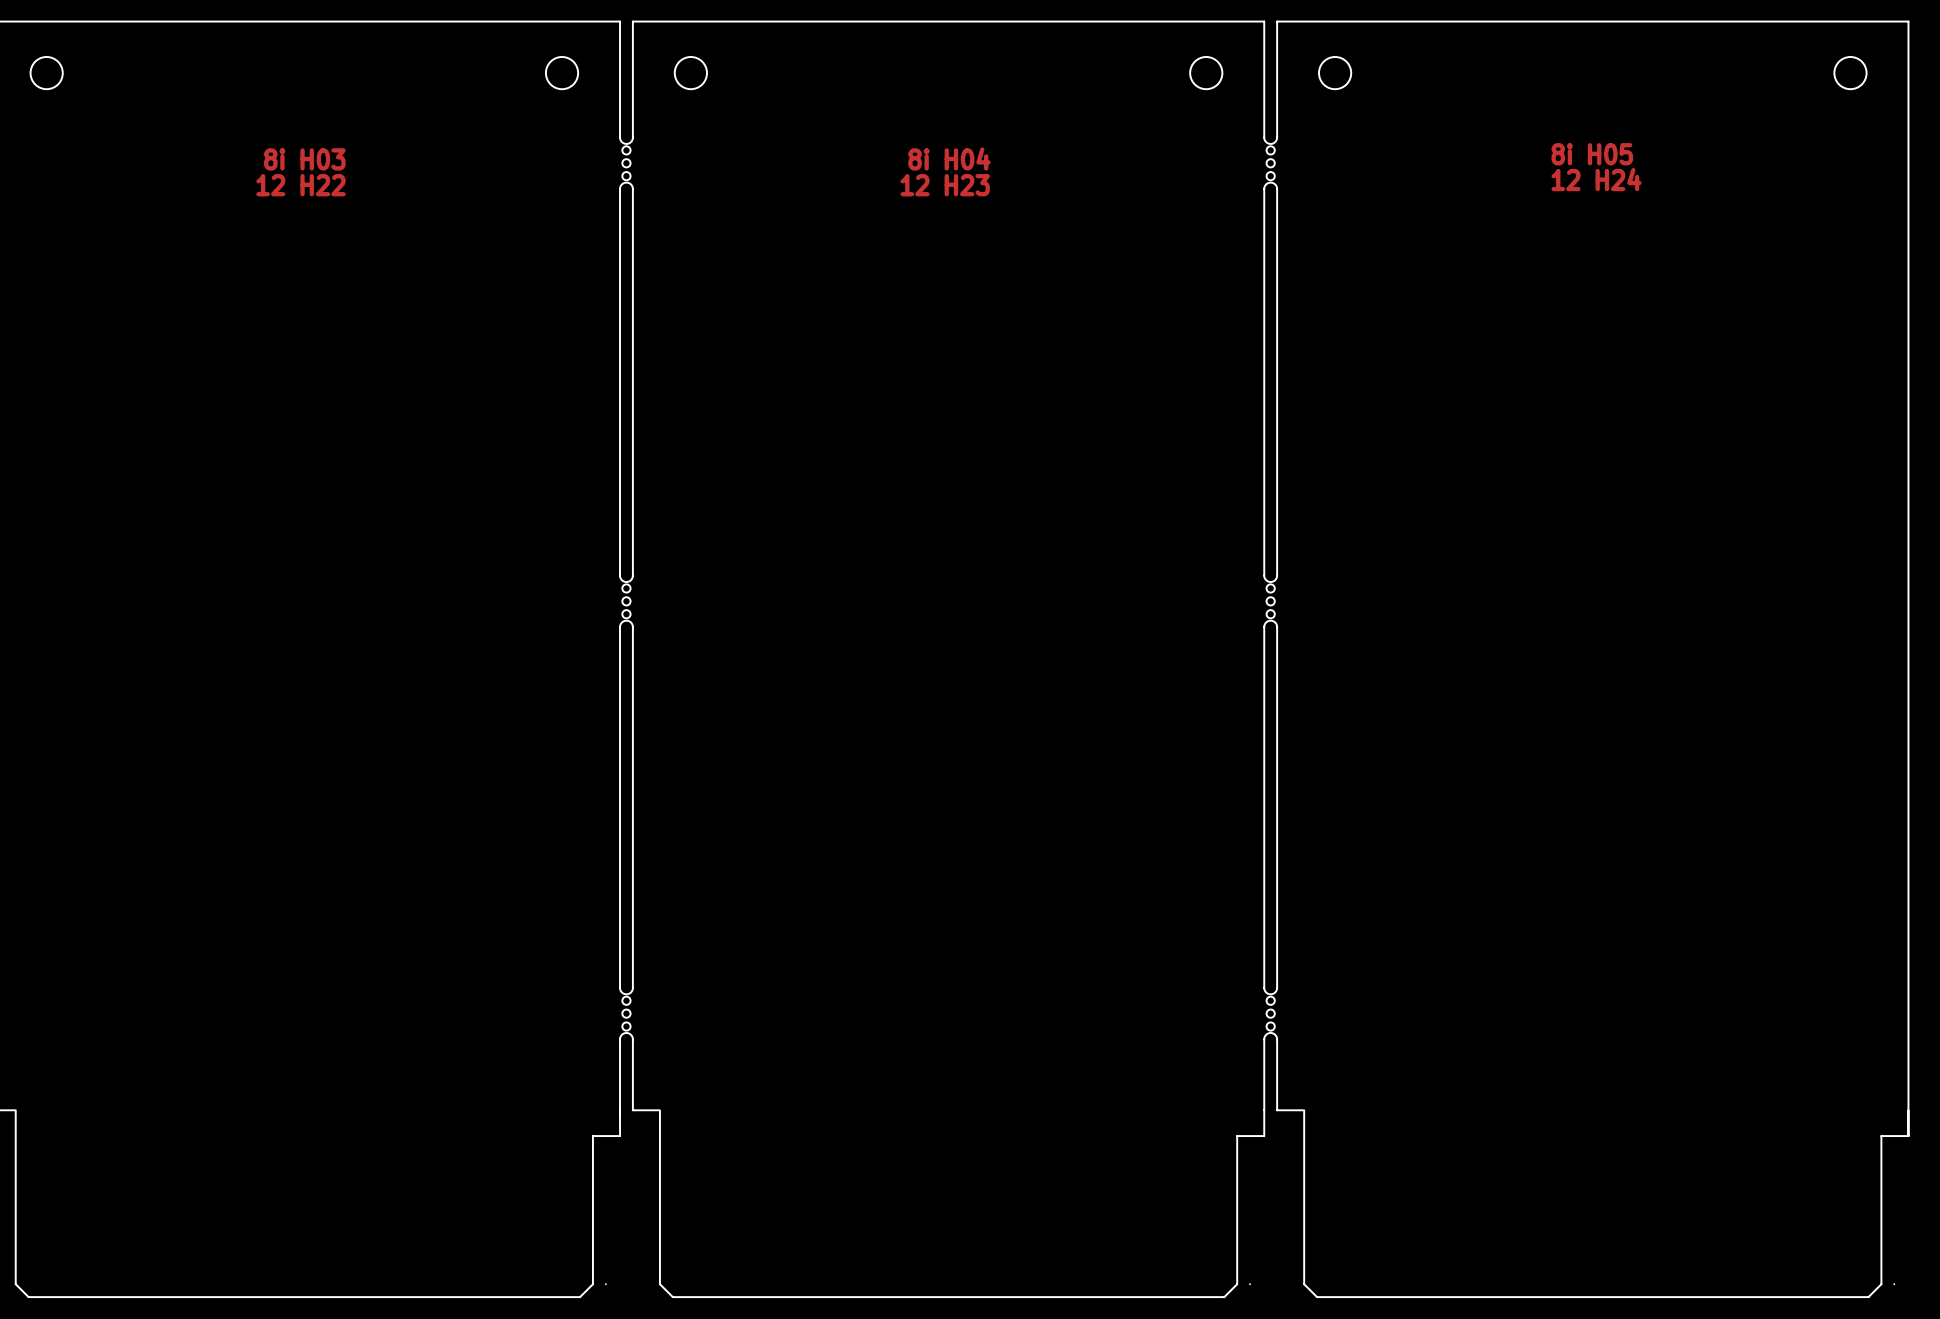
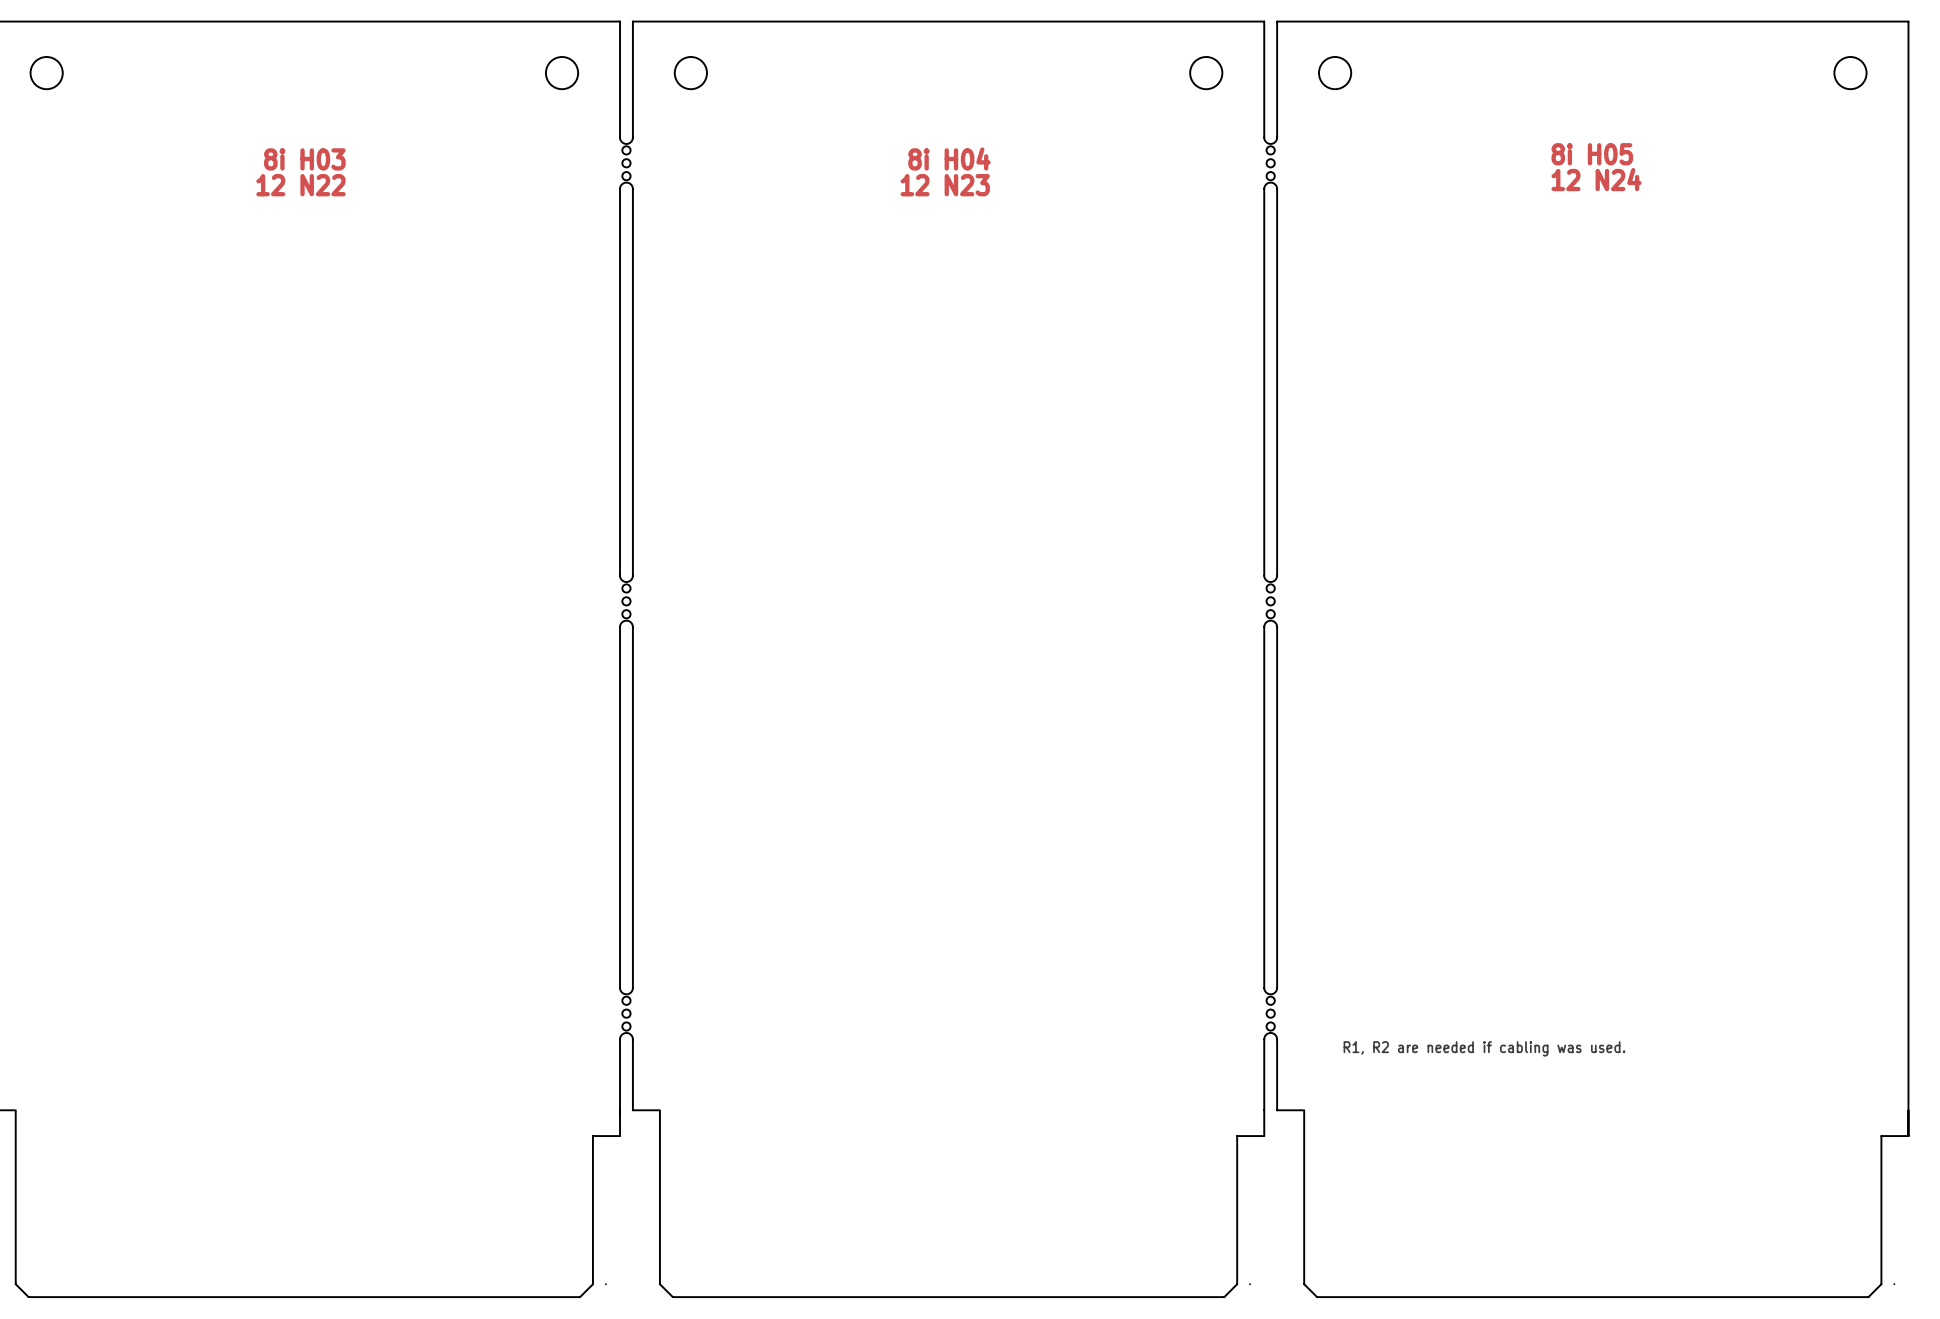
text: 12 H24 (1596, 179) -> 12 N24 (1596, 179)
text: 12 H22 (300, 185) -> 12 N22 (300, 185)
text: 12 H23 (945, 185) -> 12 N23 (945, 185)
text: none -> R1, R2 are needed if cabling was used. (1484, 1048)

